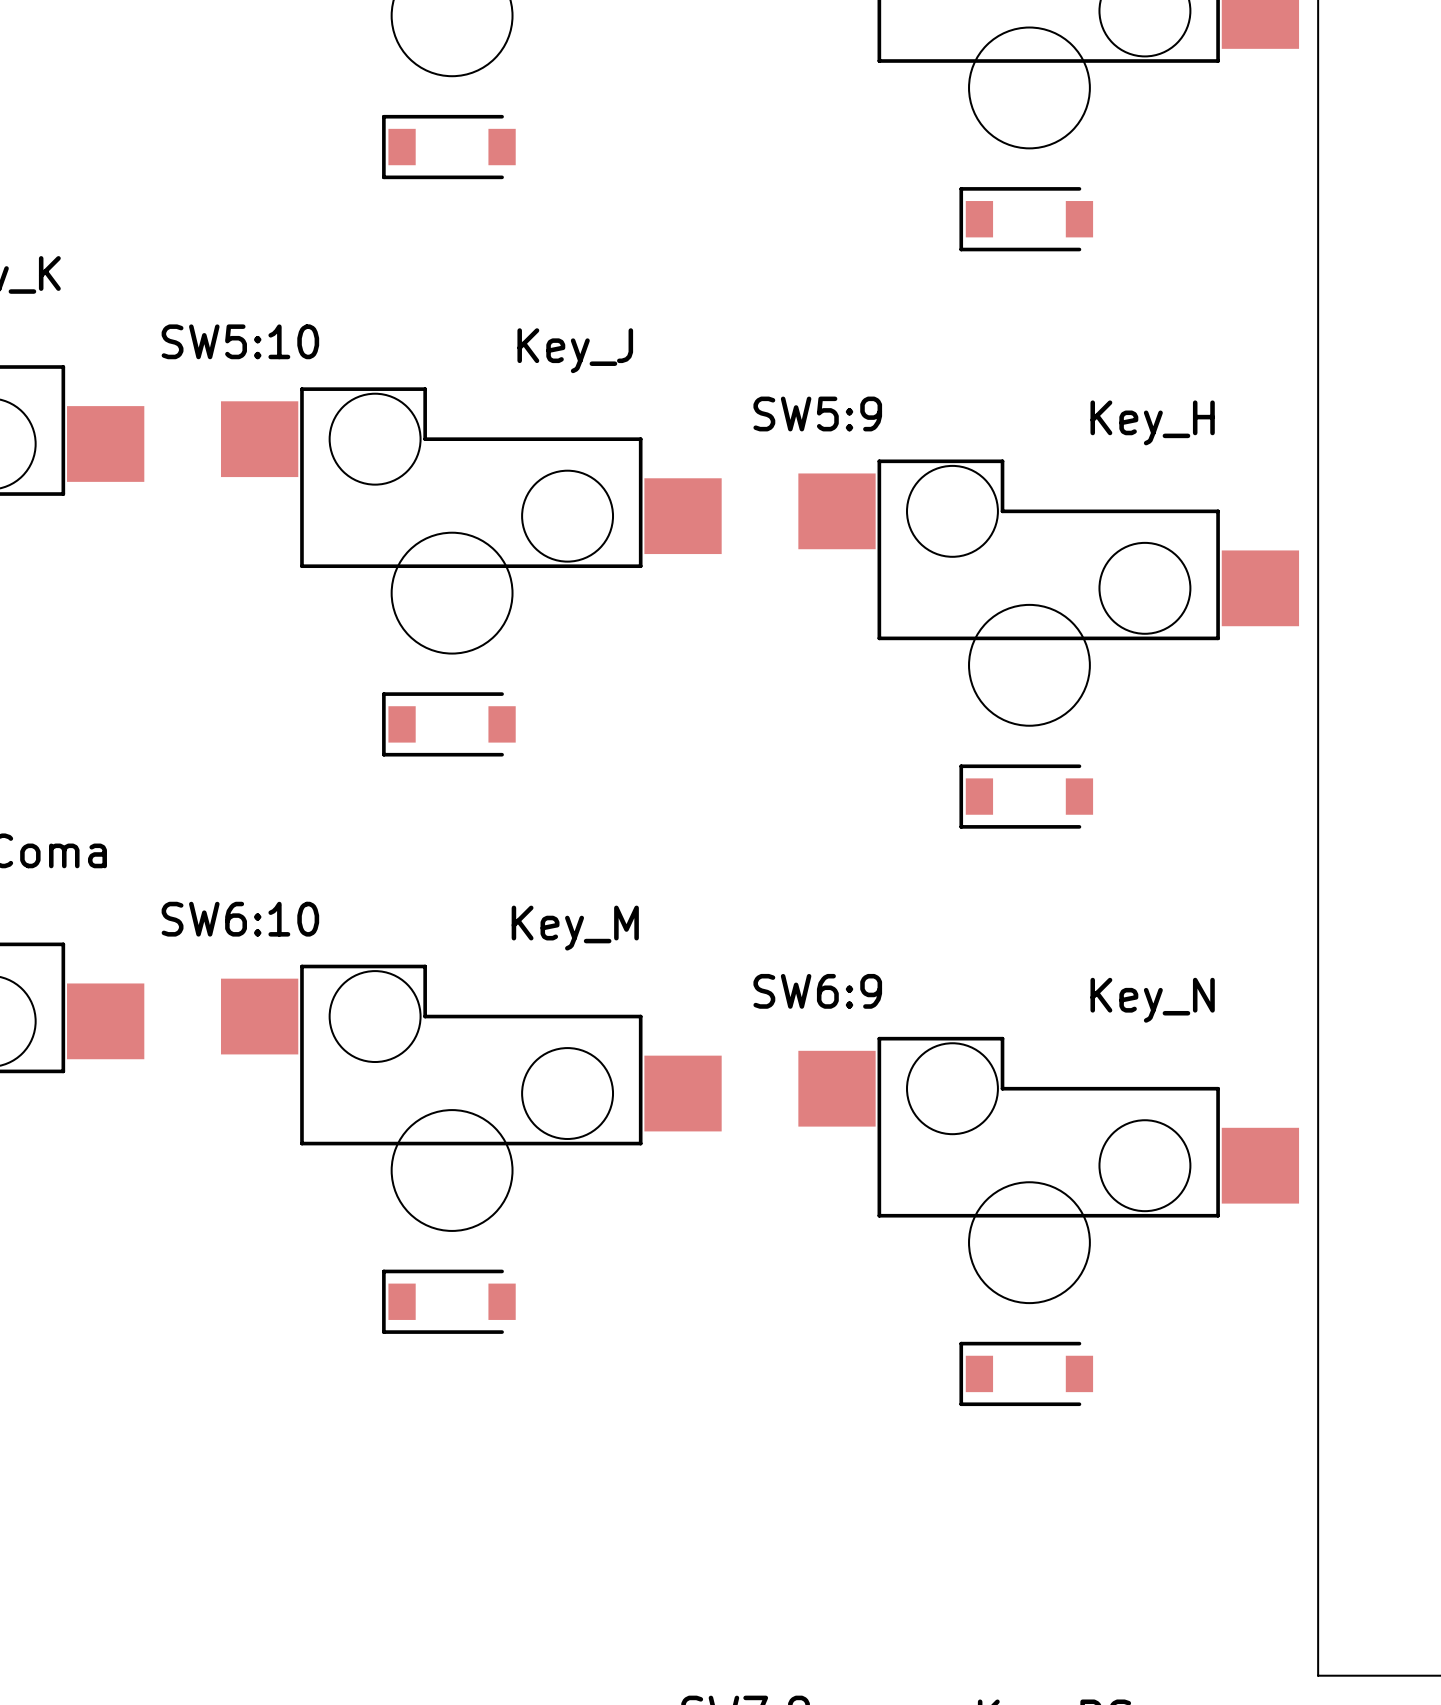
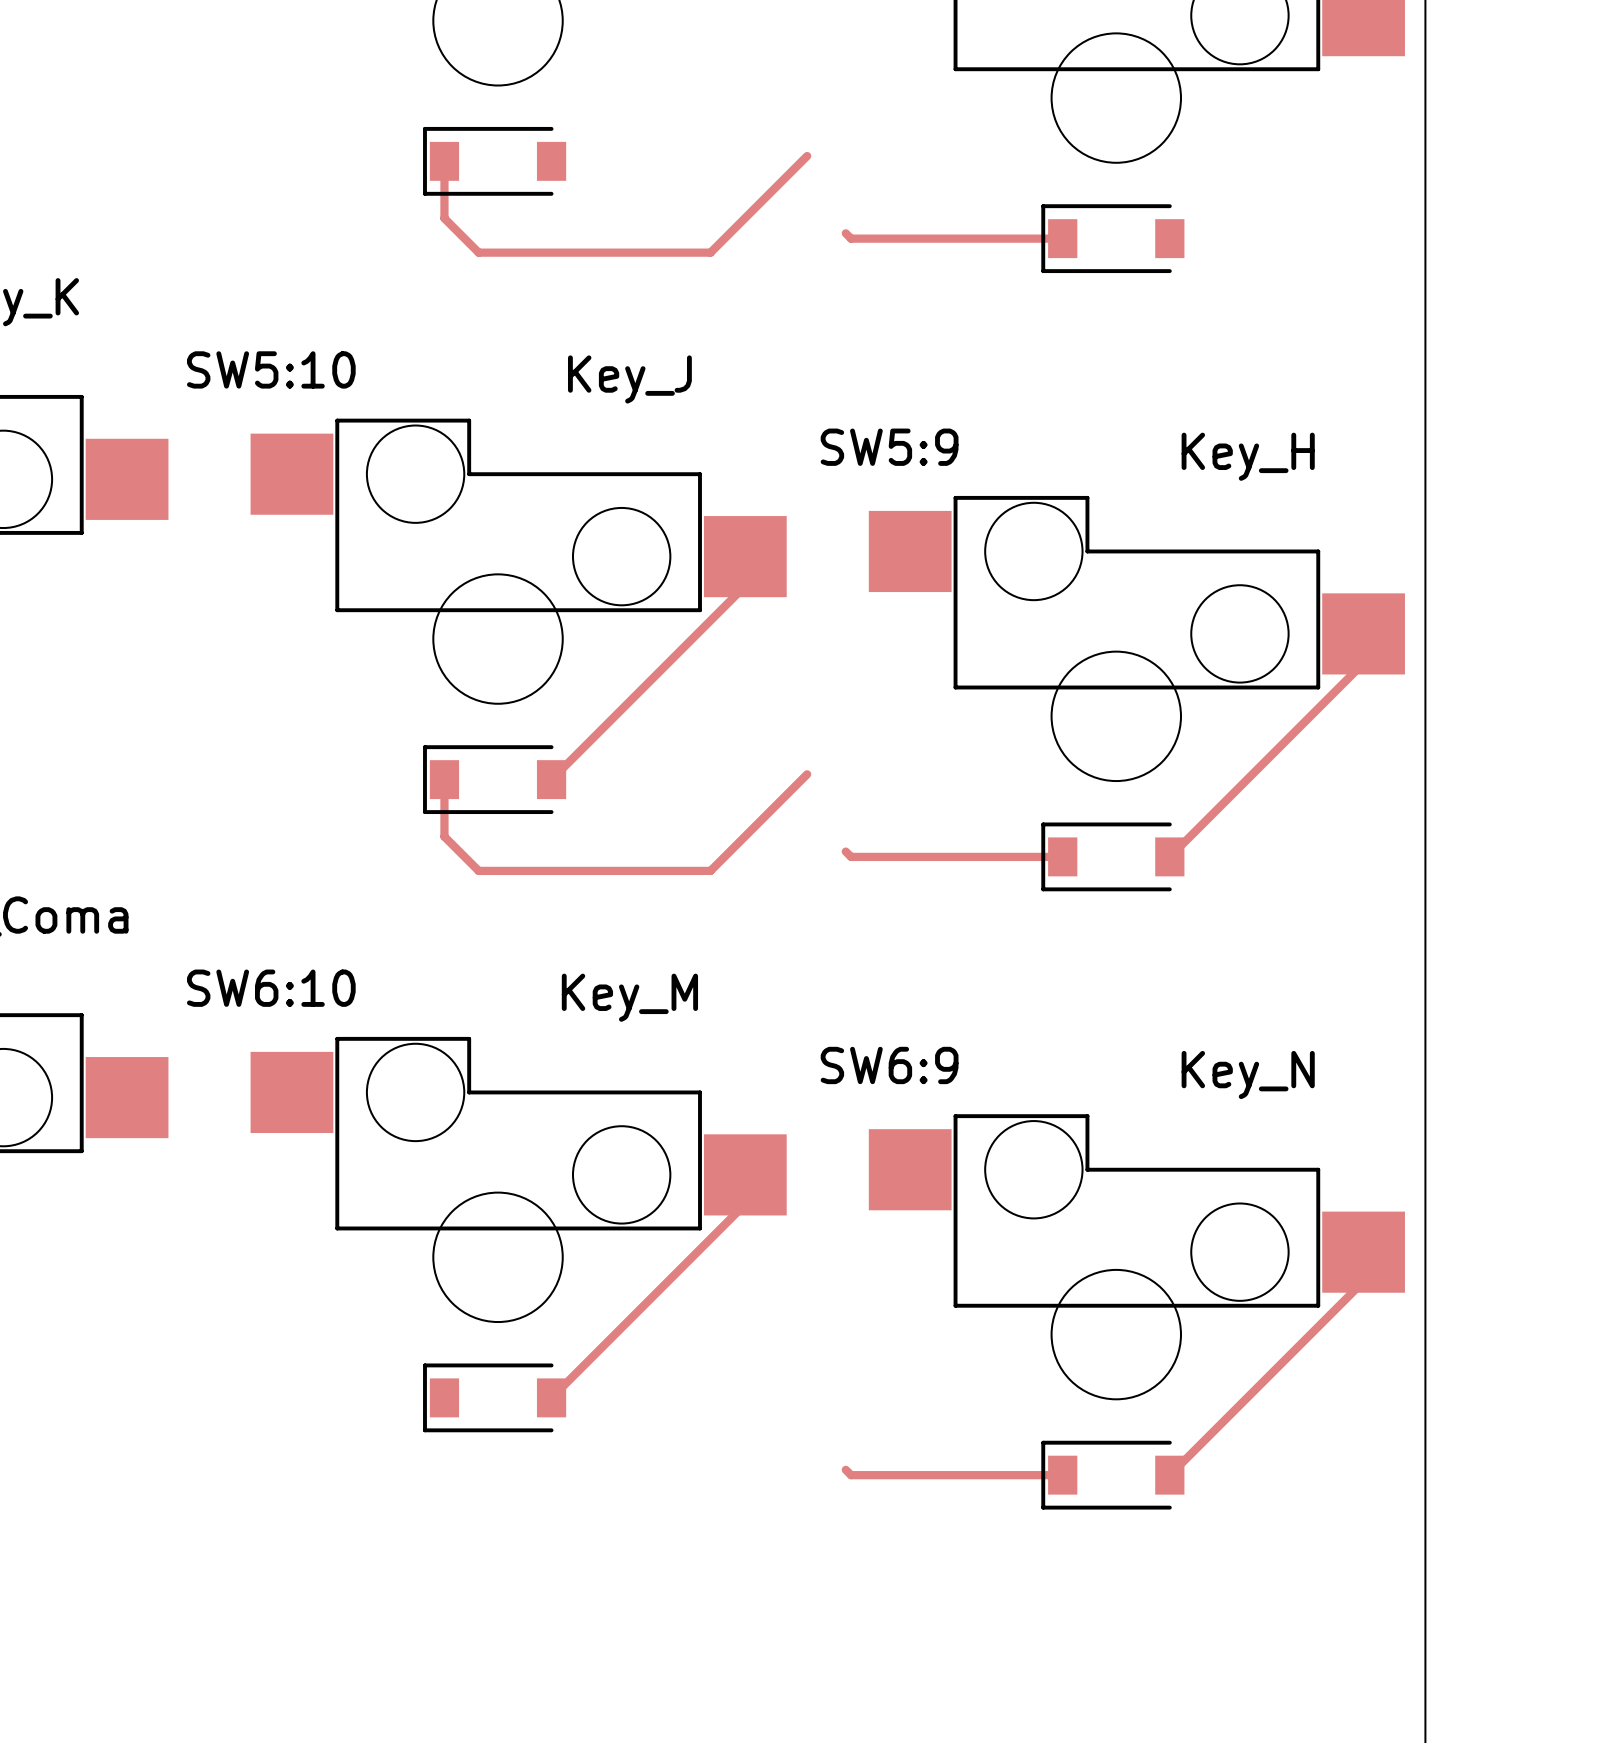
track: none -> (807, 156) (710, 252) (478, 252) (444, 218) (444, 161)
track: none -> (845, 233) (851, 238) (1062, 238)
track: none -> (745, 556) (745, 585) (551, 779)
track: none -> (1363, 633) (1363, 663) (1169, 856)
track: none -> (807, 774) (710, 870) (478, 870) (444, 836) (444, 779)
track: none -> (845, 851) (851, 856) (1062, 856)
track: none -> (745, 1174) (745, 1204) (551, 1397)
track: none -> (1363, 1252) (1363, 1281) (1169, 1475)
track: none -> (845, 1469) (851, 1475) (1062, 1475)

